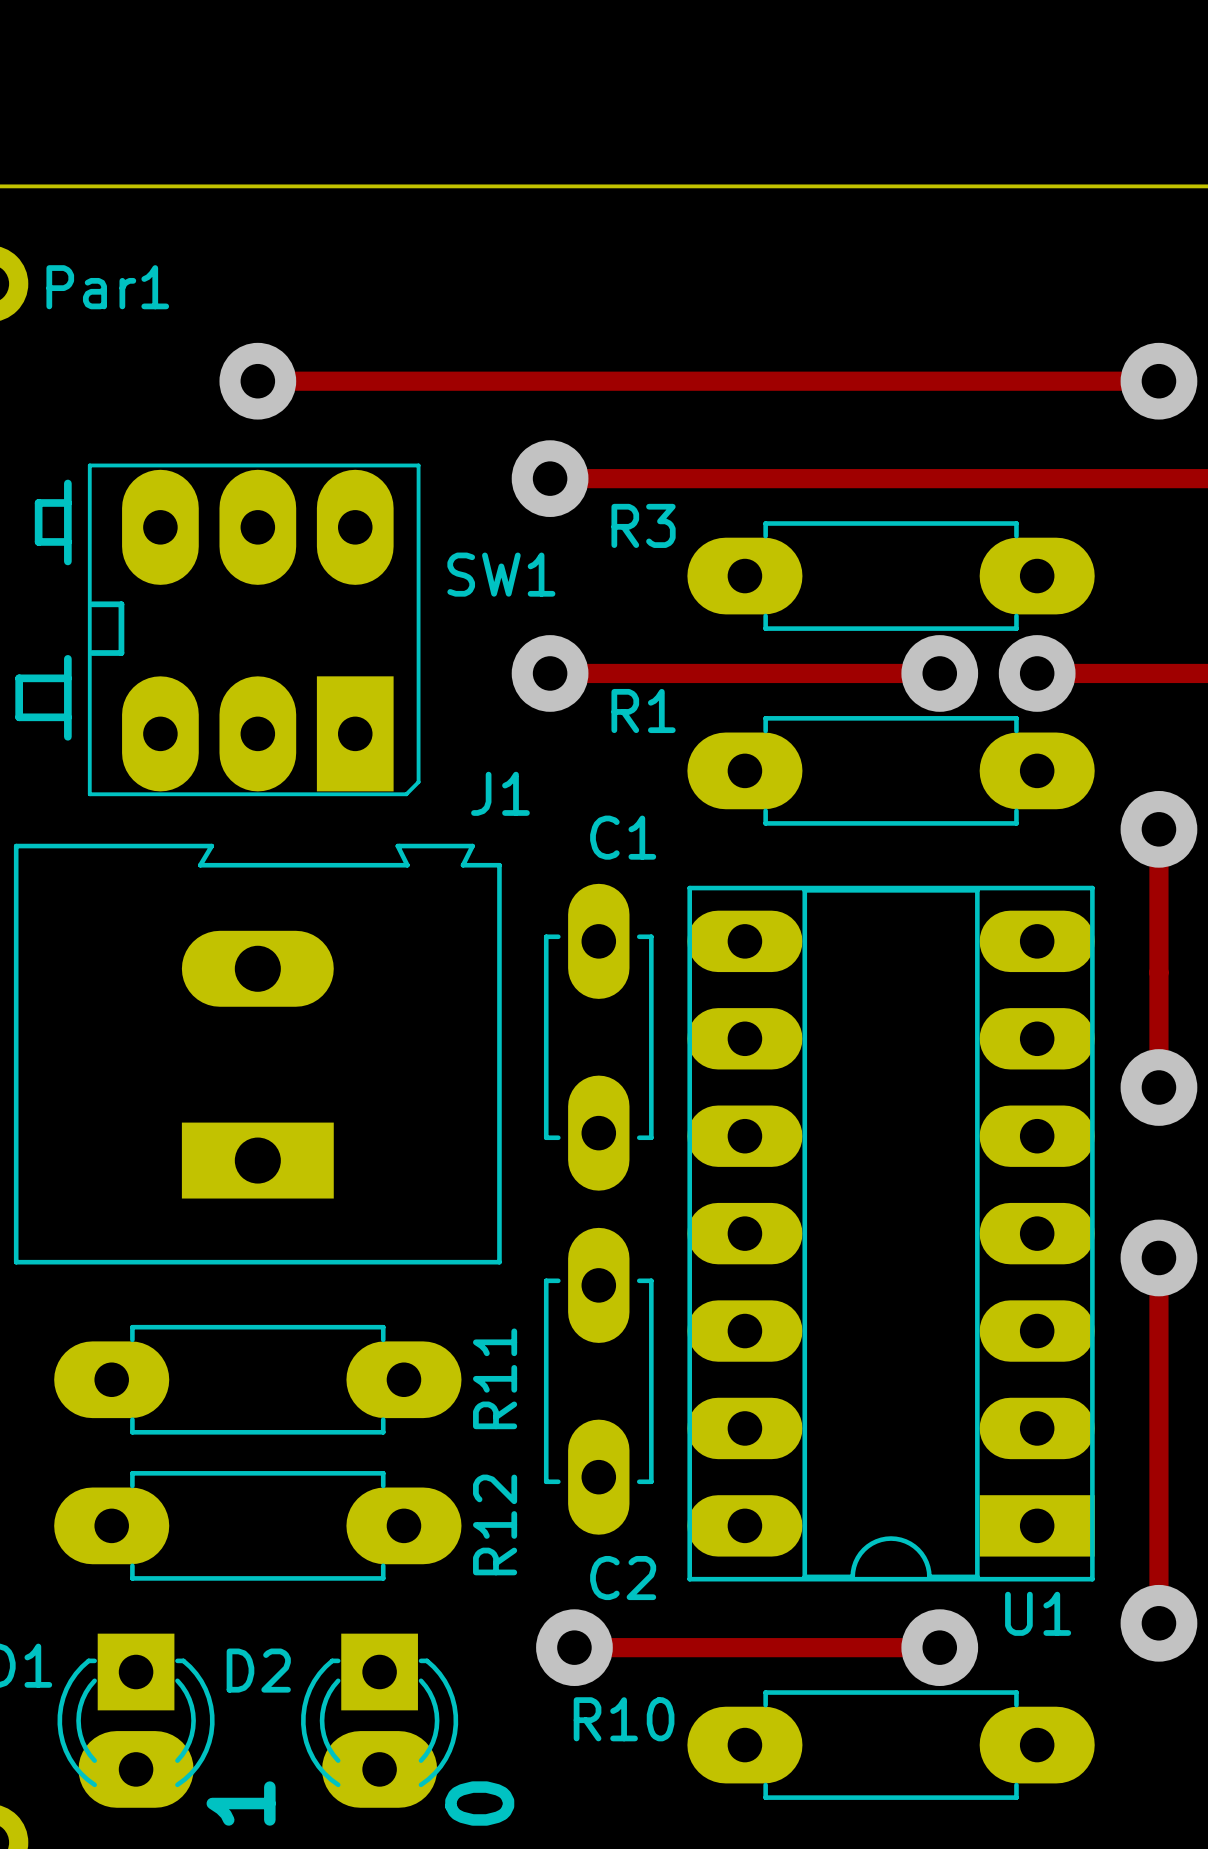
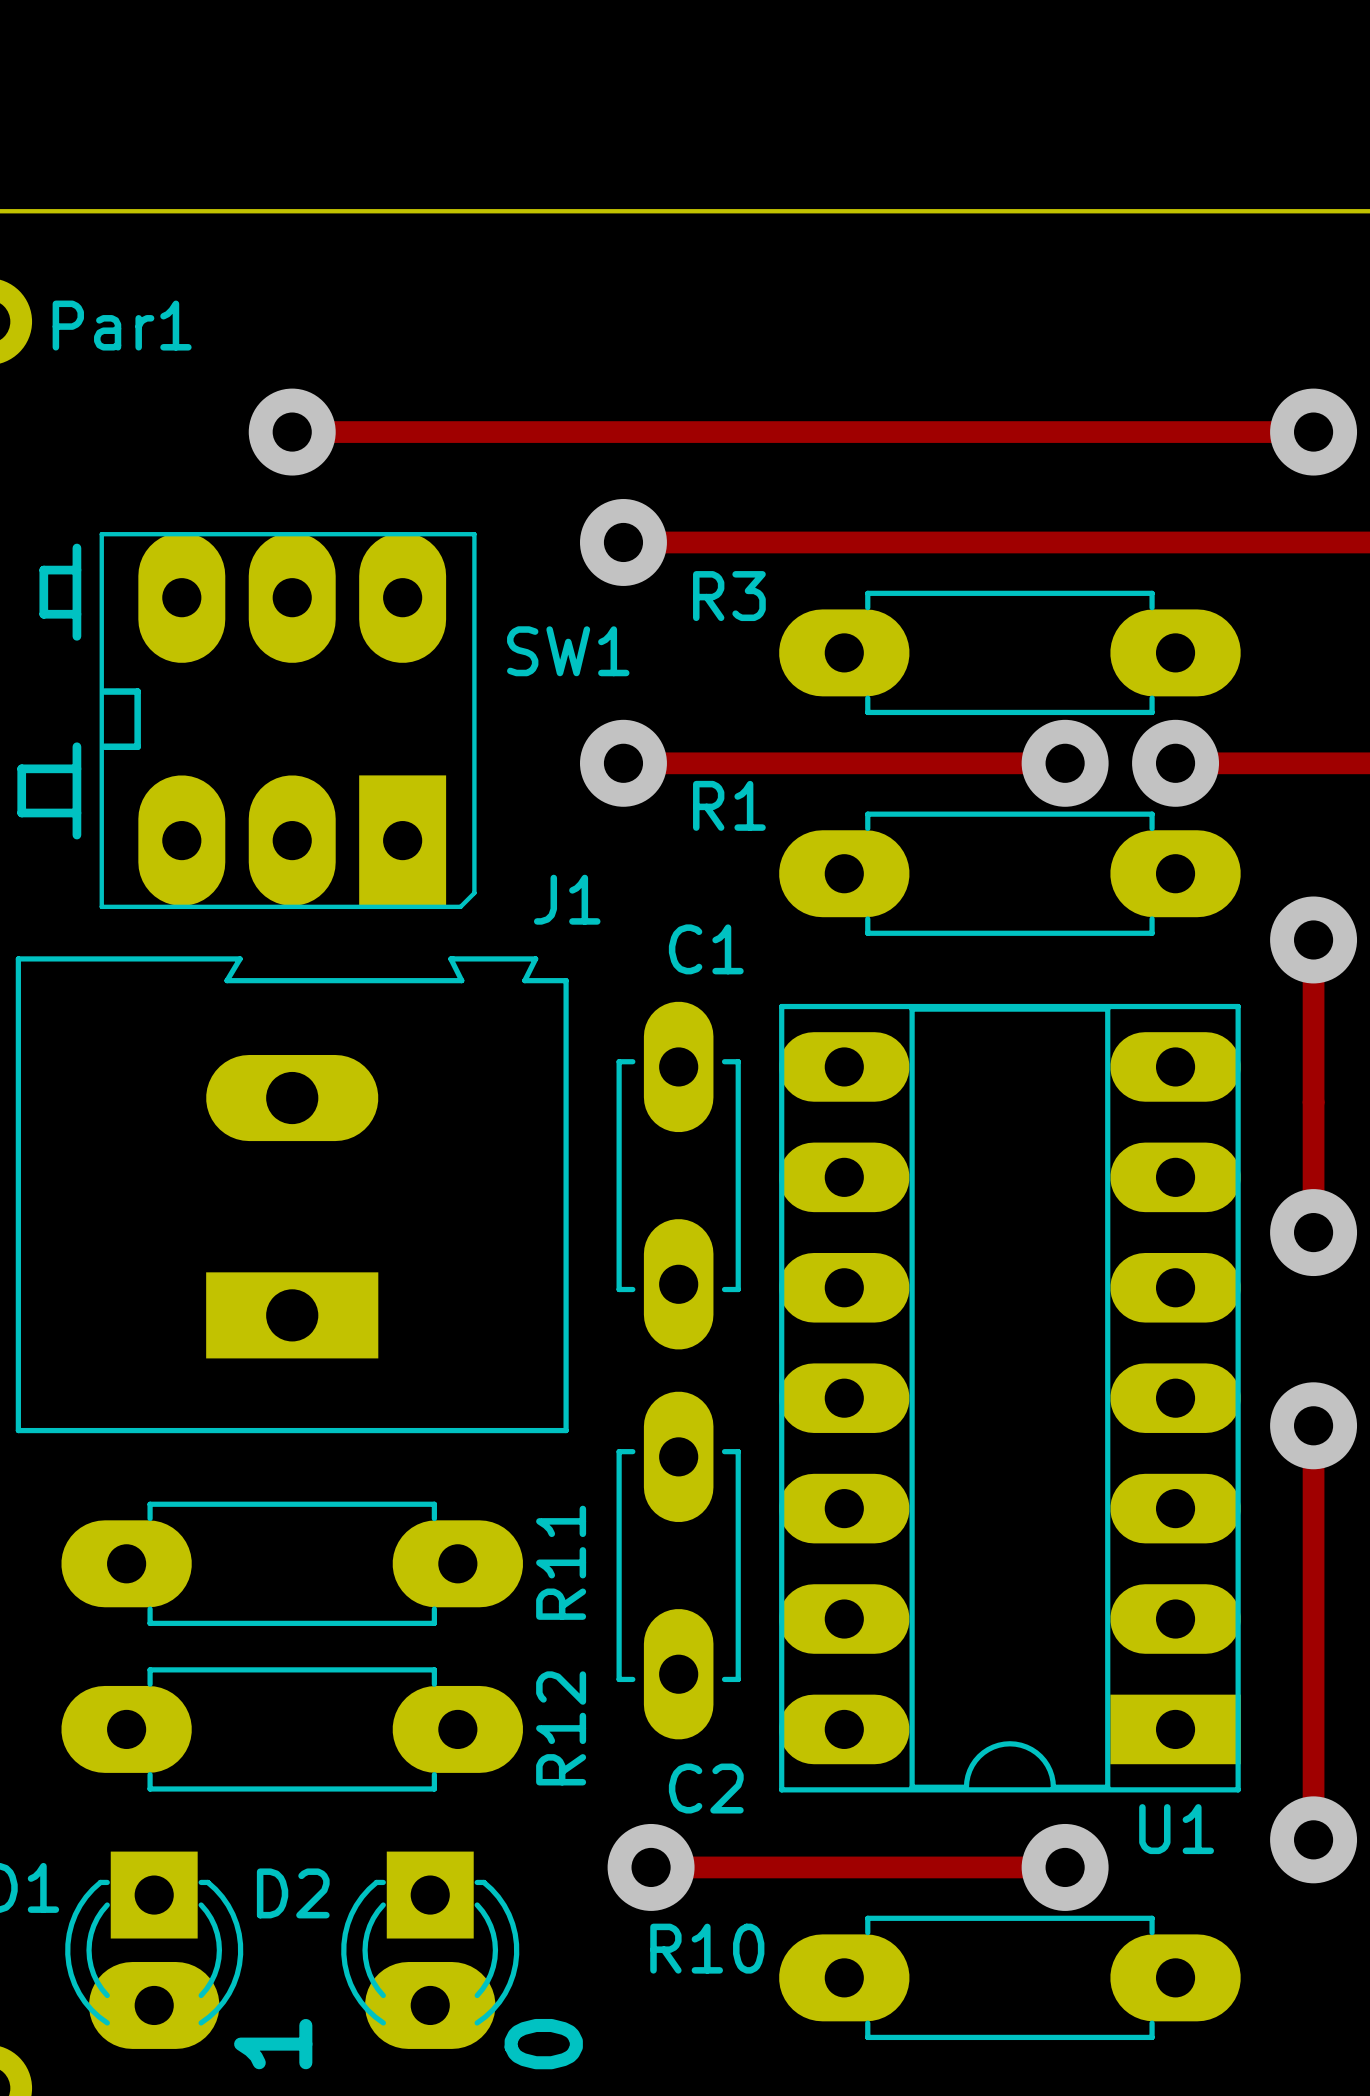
SW1 footprint: [87, 463, 421, 797] -> [99, 532, 477, 910]

